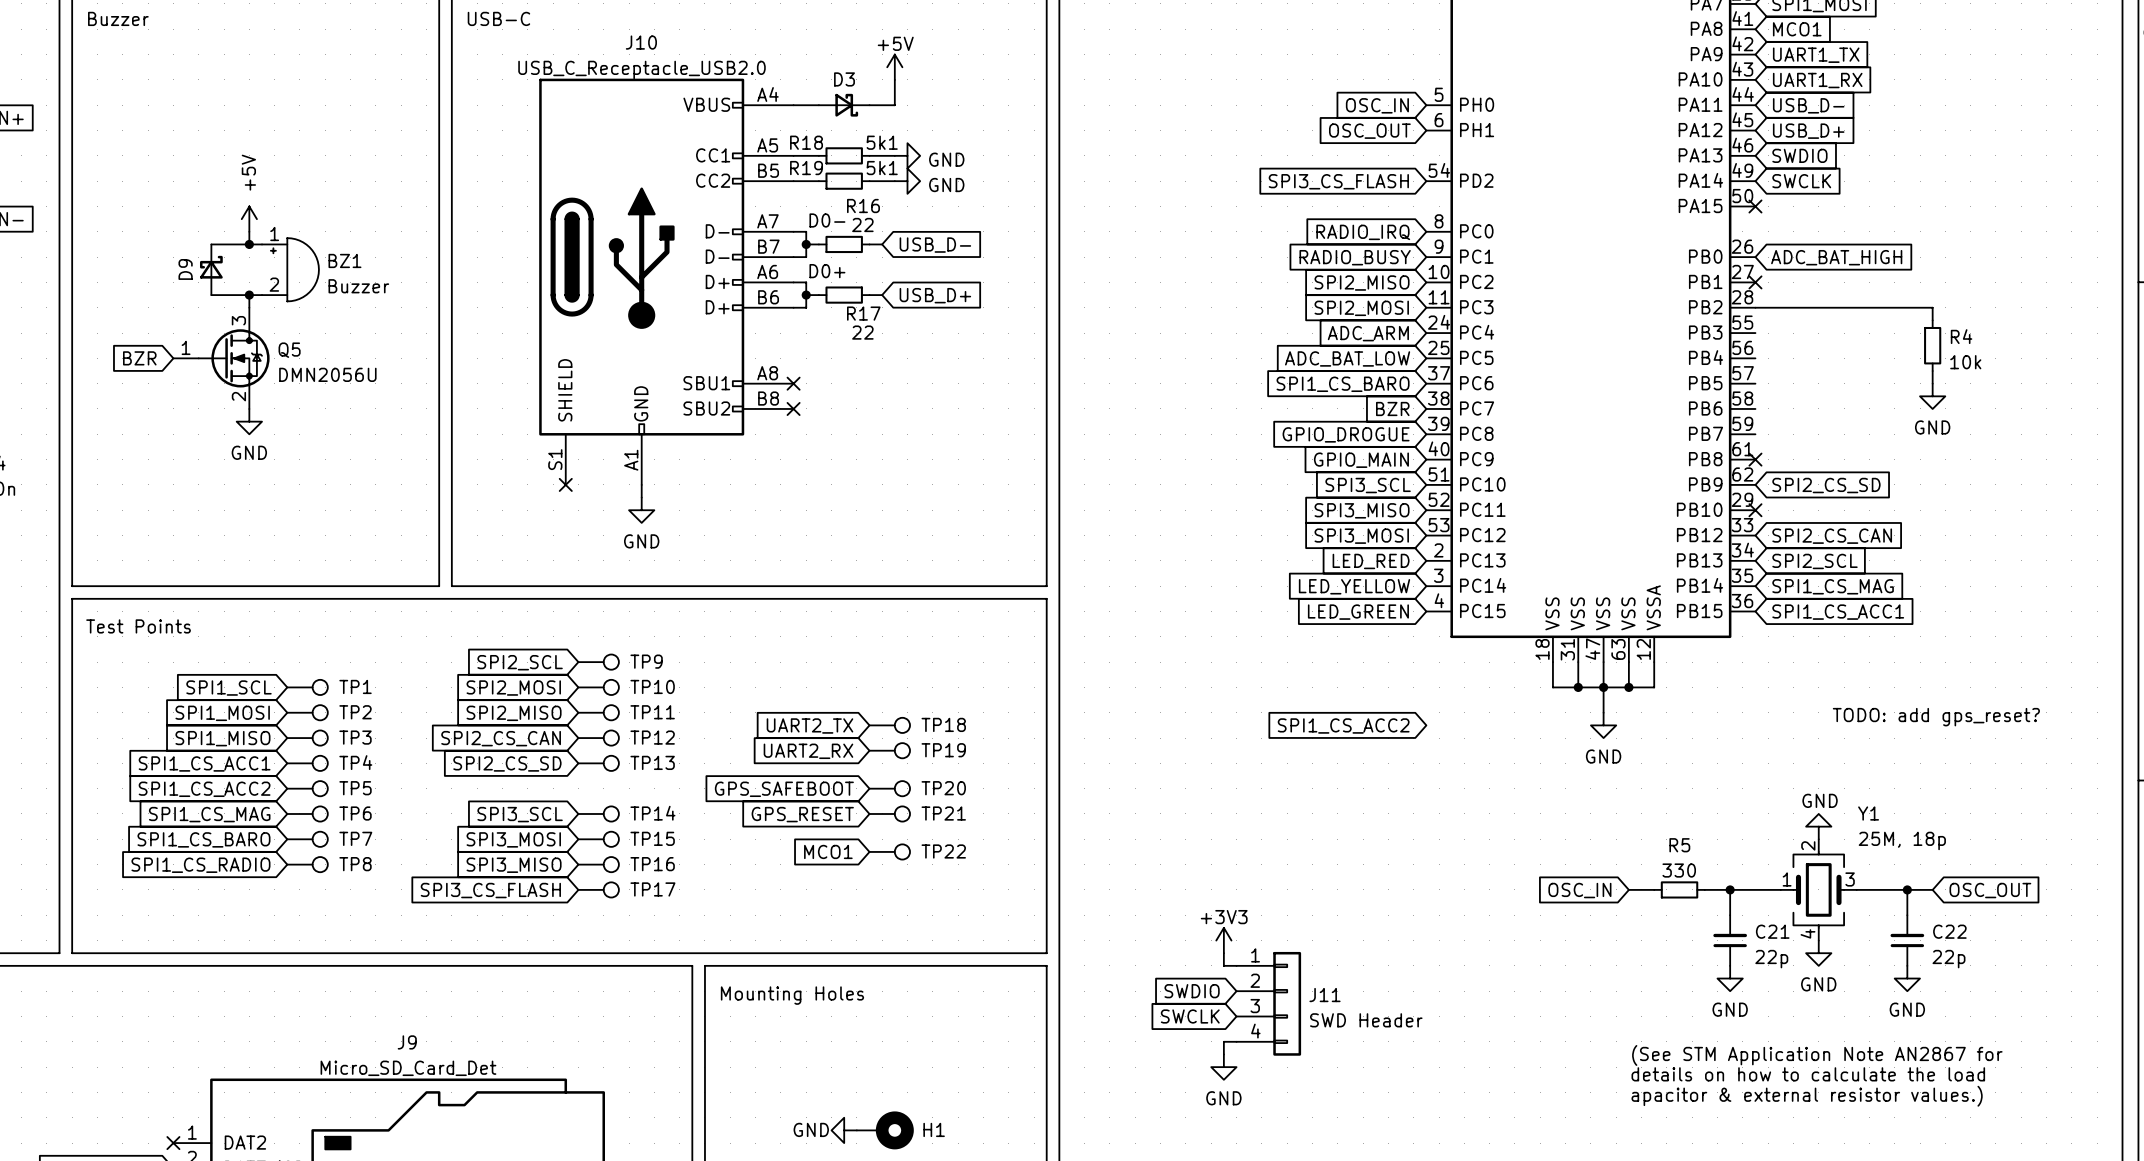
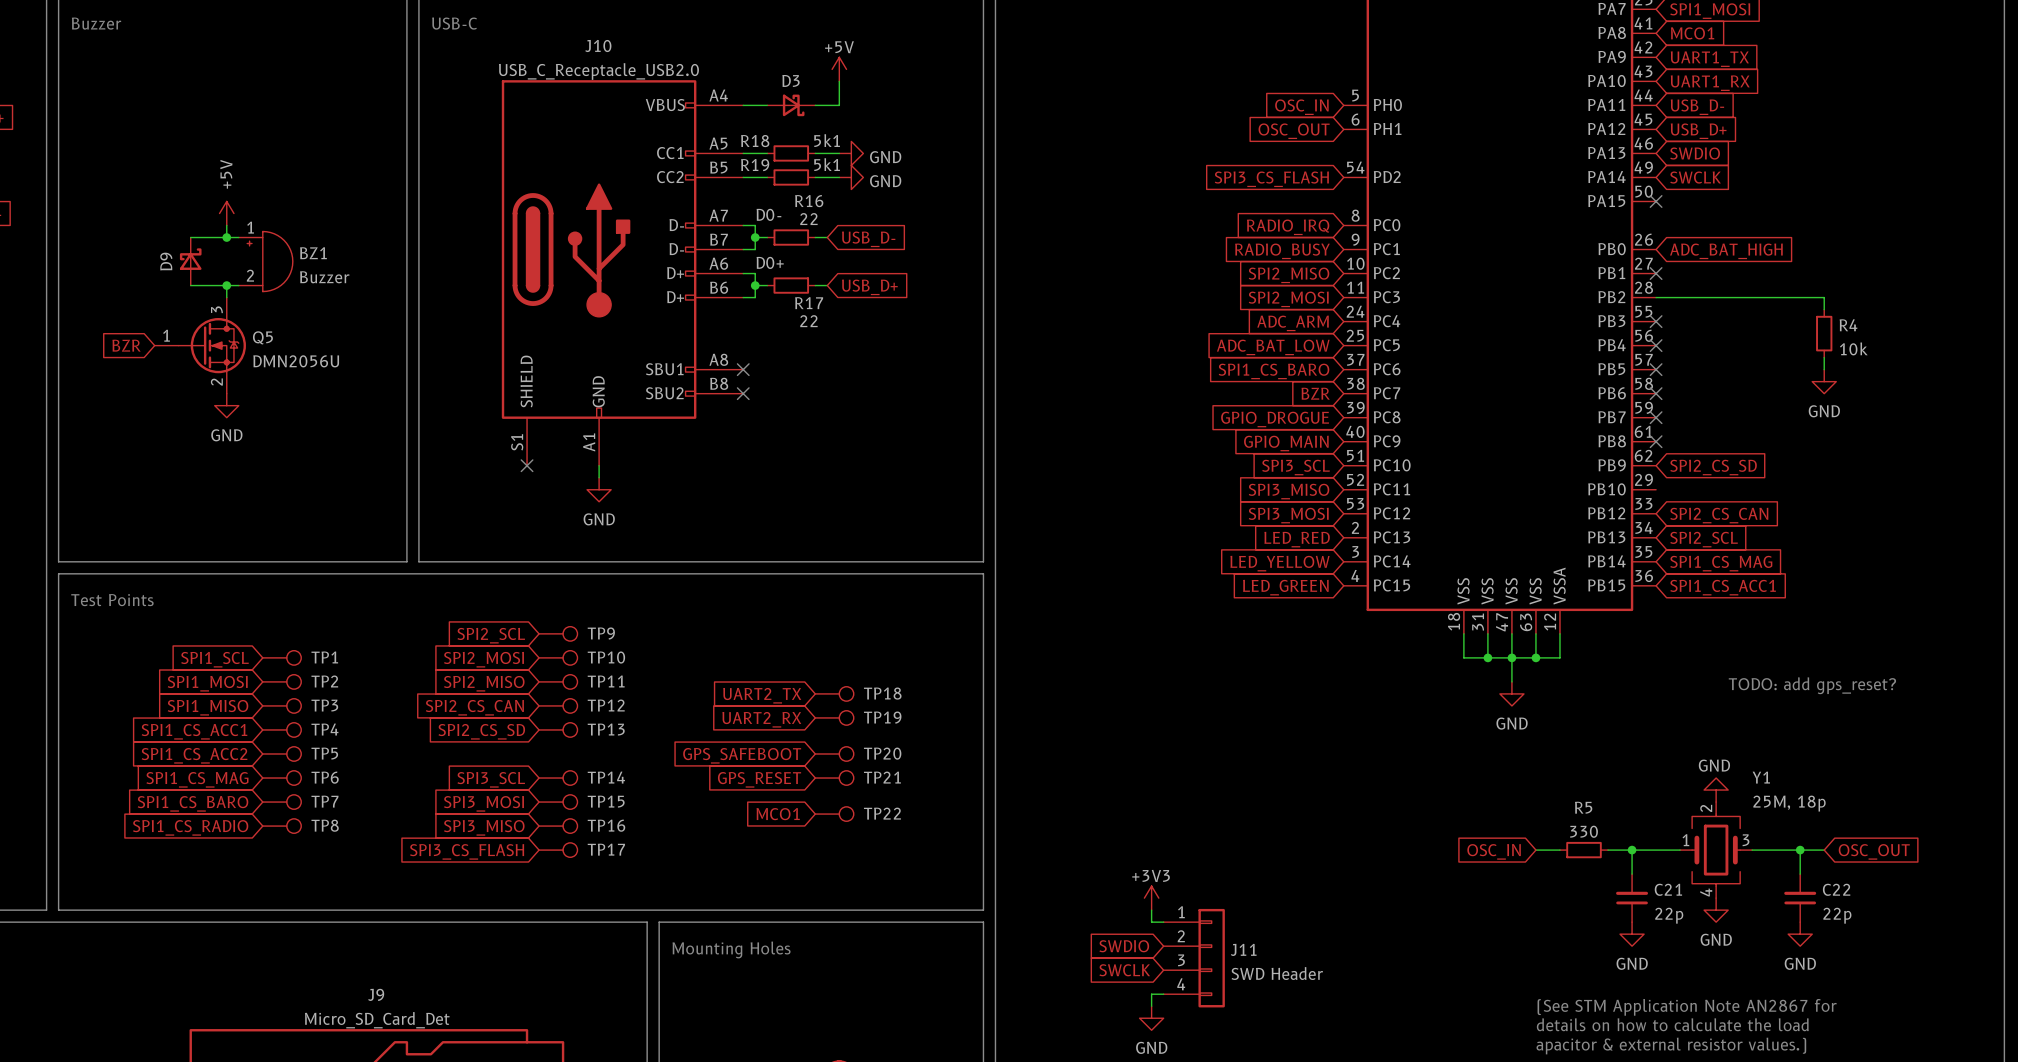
no-connect mark: none -> (1656, 321)
no-connect mark: none -> (1656, 345)
no-connect mark: none -> (1656, 369)
no-connect mark: none -> (1656, 393)
no-connect mark: none -> (1656, 417)
no-connect mark: (1755, 510) -> none
global label: SPI1_CS_ACC2 (1343, 726) -> none

